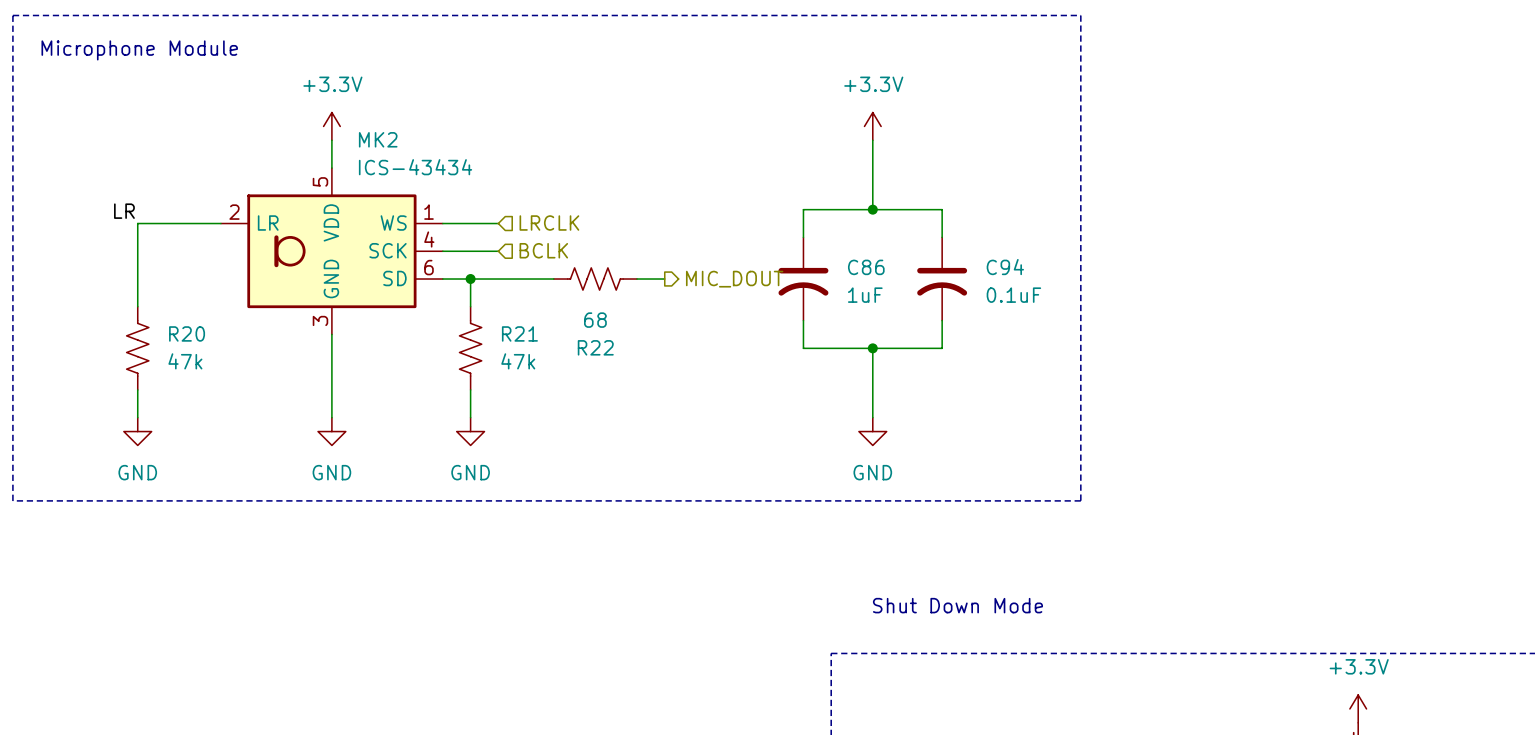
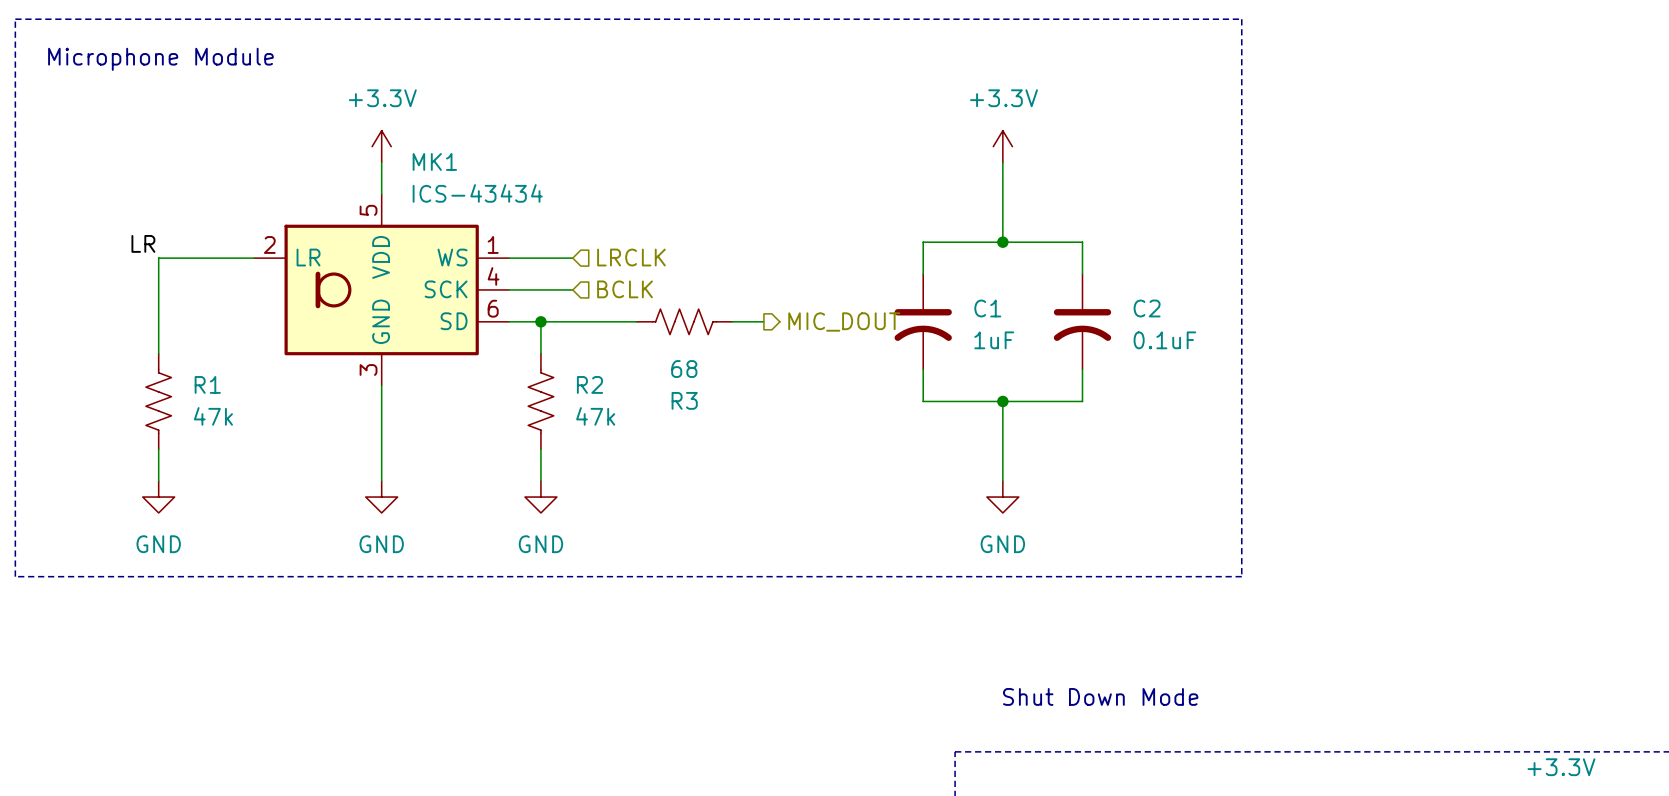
MK2 name: MK2 (378, 139) -> MK1 (434, 161)
C86 name: C86 (866, 267) -> C1 (987, 308)
C94 name: C94 (1005, 267) -> C2 (1147, 308)
R20 name: R20 (187, 333) -> R1 (207, 384)
R21 name: R21 (519, 333) -> R2 (589, 384)
R22 name: R22 (595, 347) -> R3 (684, 400)

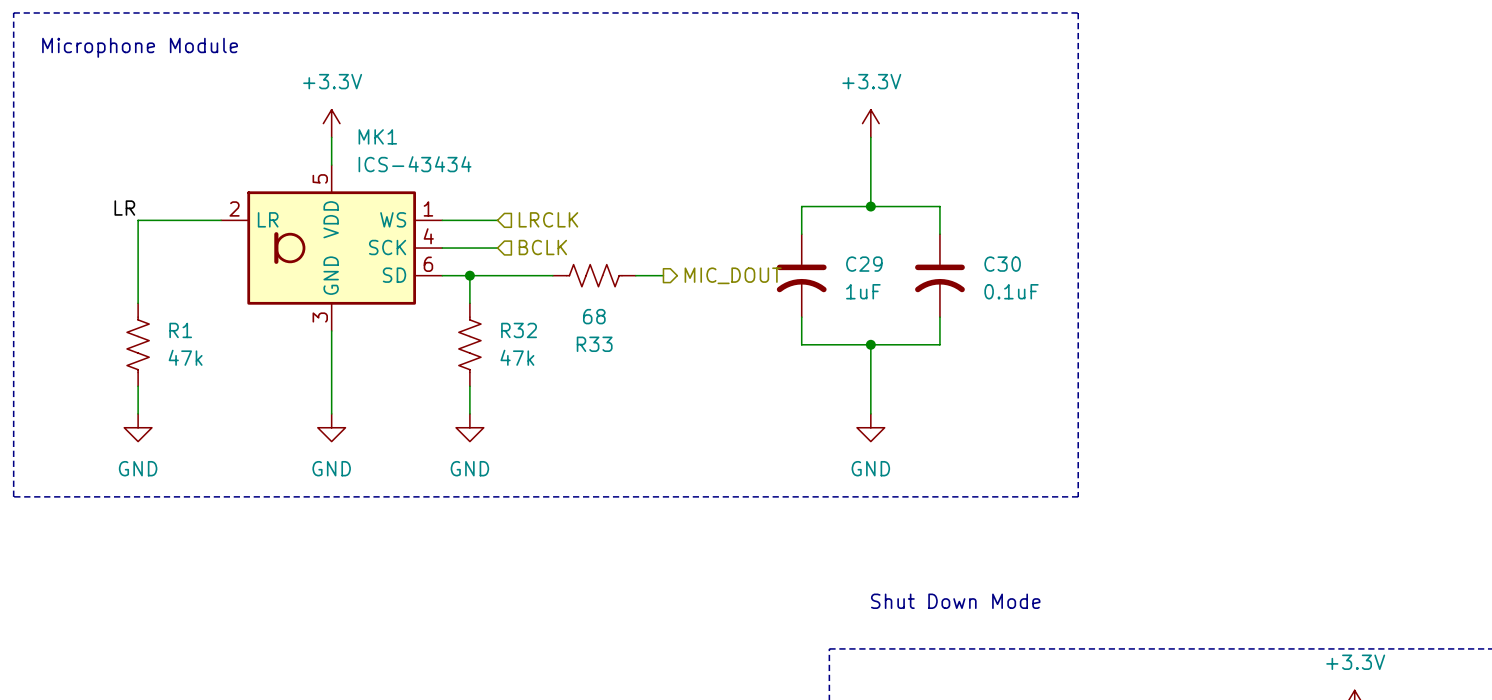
C1 name: C1 (987, 308) -> C29 (864, 264)
C2 name: C2 (1147, 308) -> C30 (1002, 264)
R2 name: R2 (589, 384) -> R32 (519, 330)
R3 name: R3 (684, 400) -> R33 (594, 344)

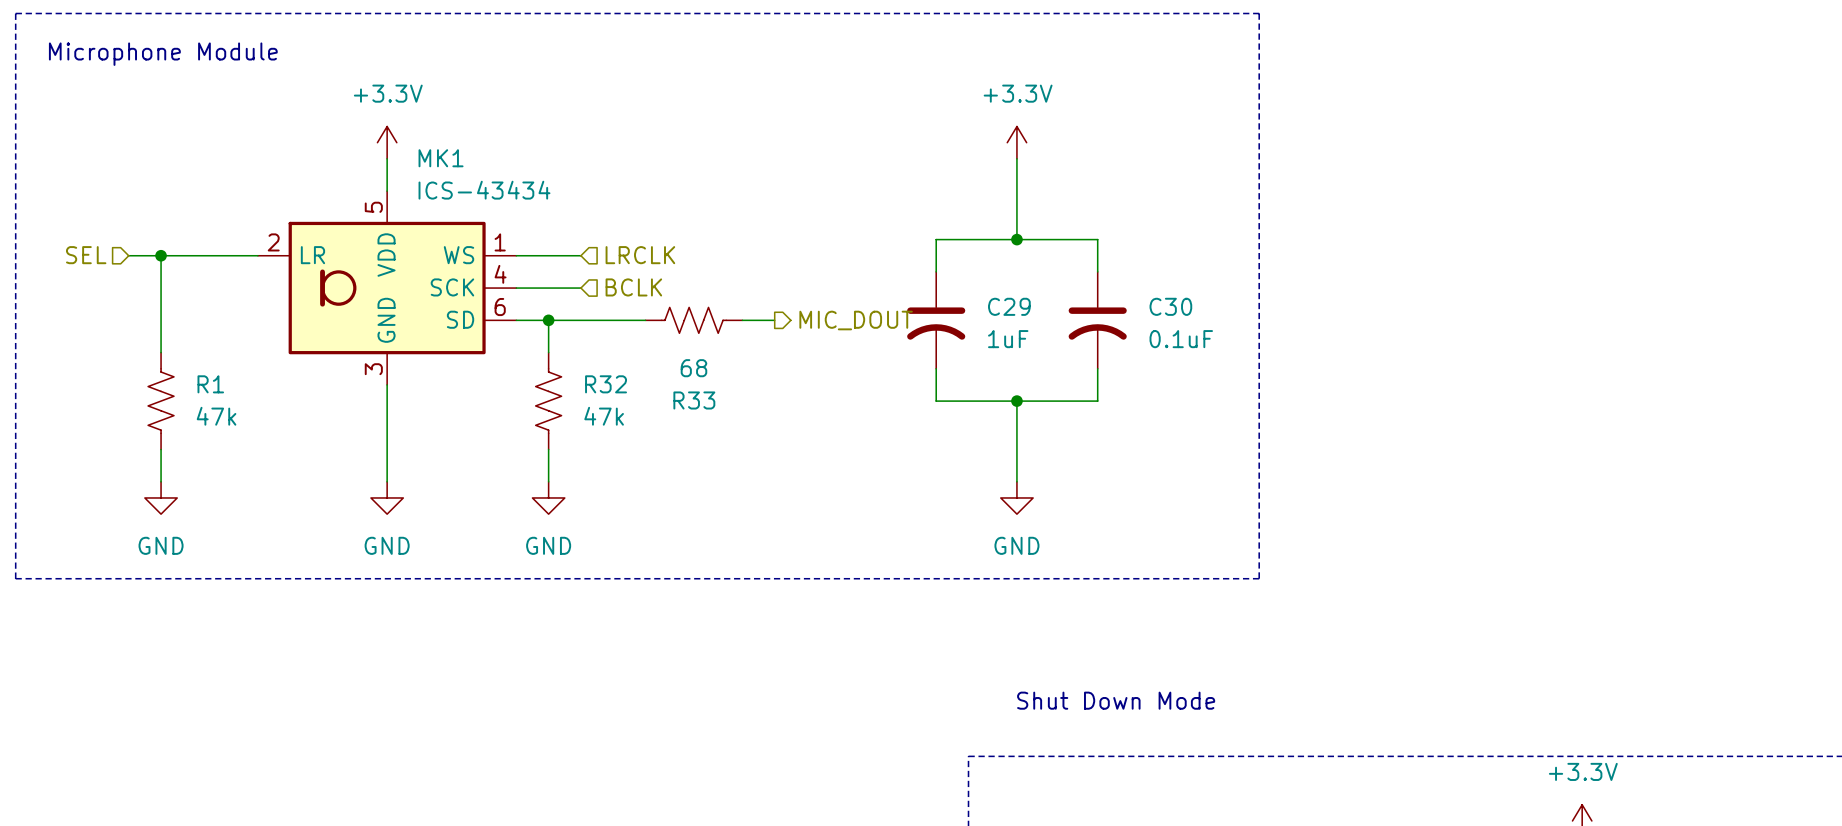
label: LR (124, 208) -> none
hierarchical label: none -> SEL (86, 255)
wire: none -> (128, 255) (161, 255)
junction: none -> (161, 255)

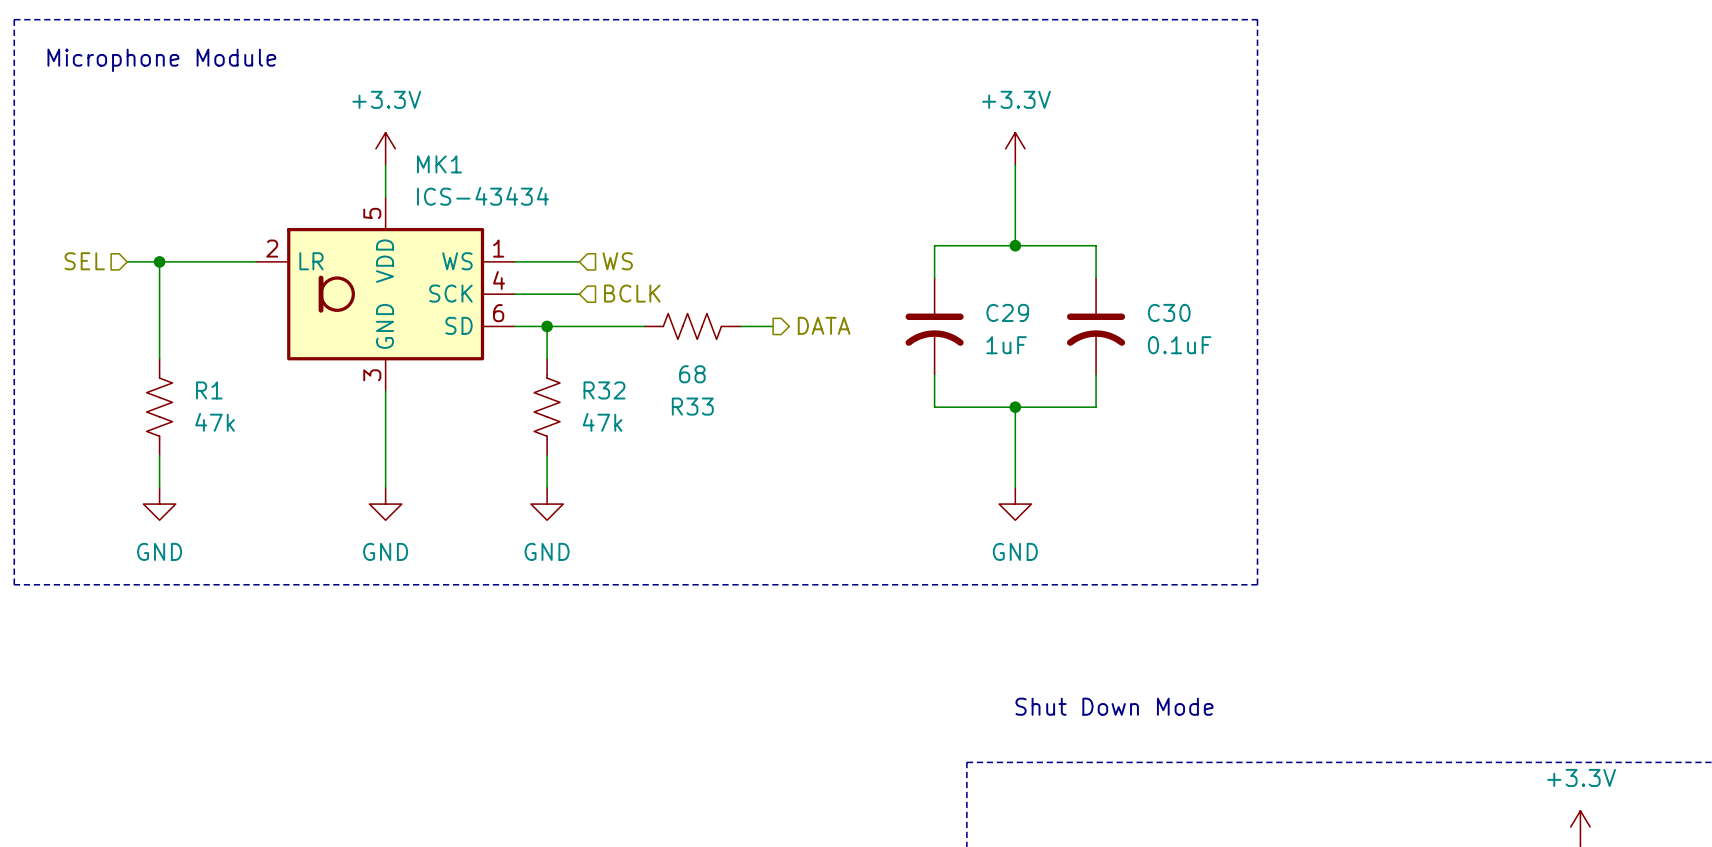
hierarchical label: LRCLK (640, 255) -> WS (617, 261)
hierarchical label: MIC_DOUT (856, 320) -> DATA (824, 325)

